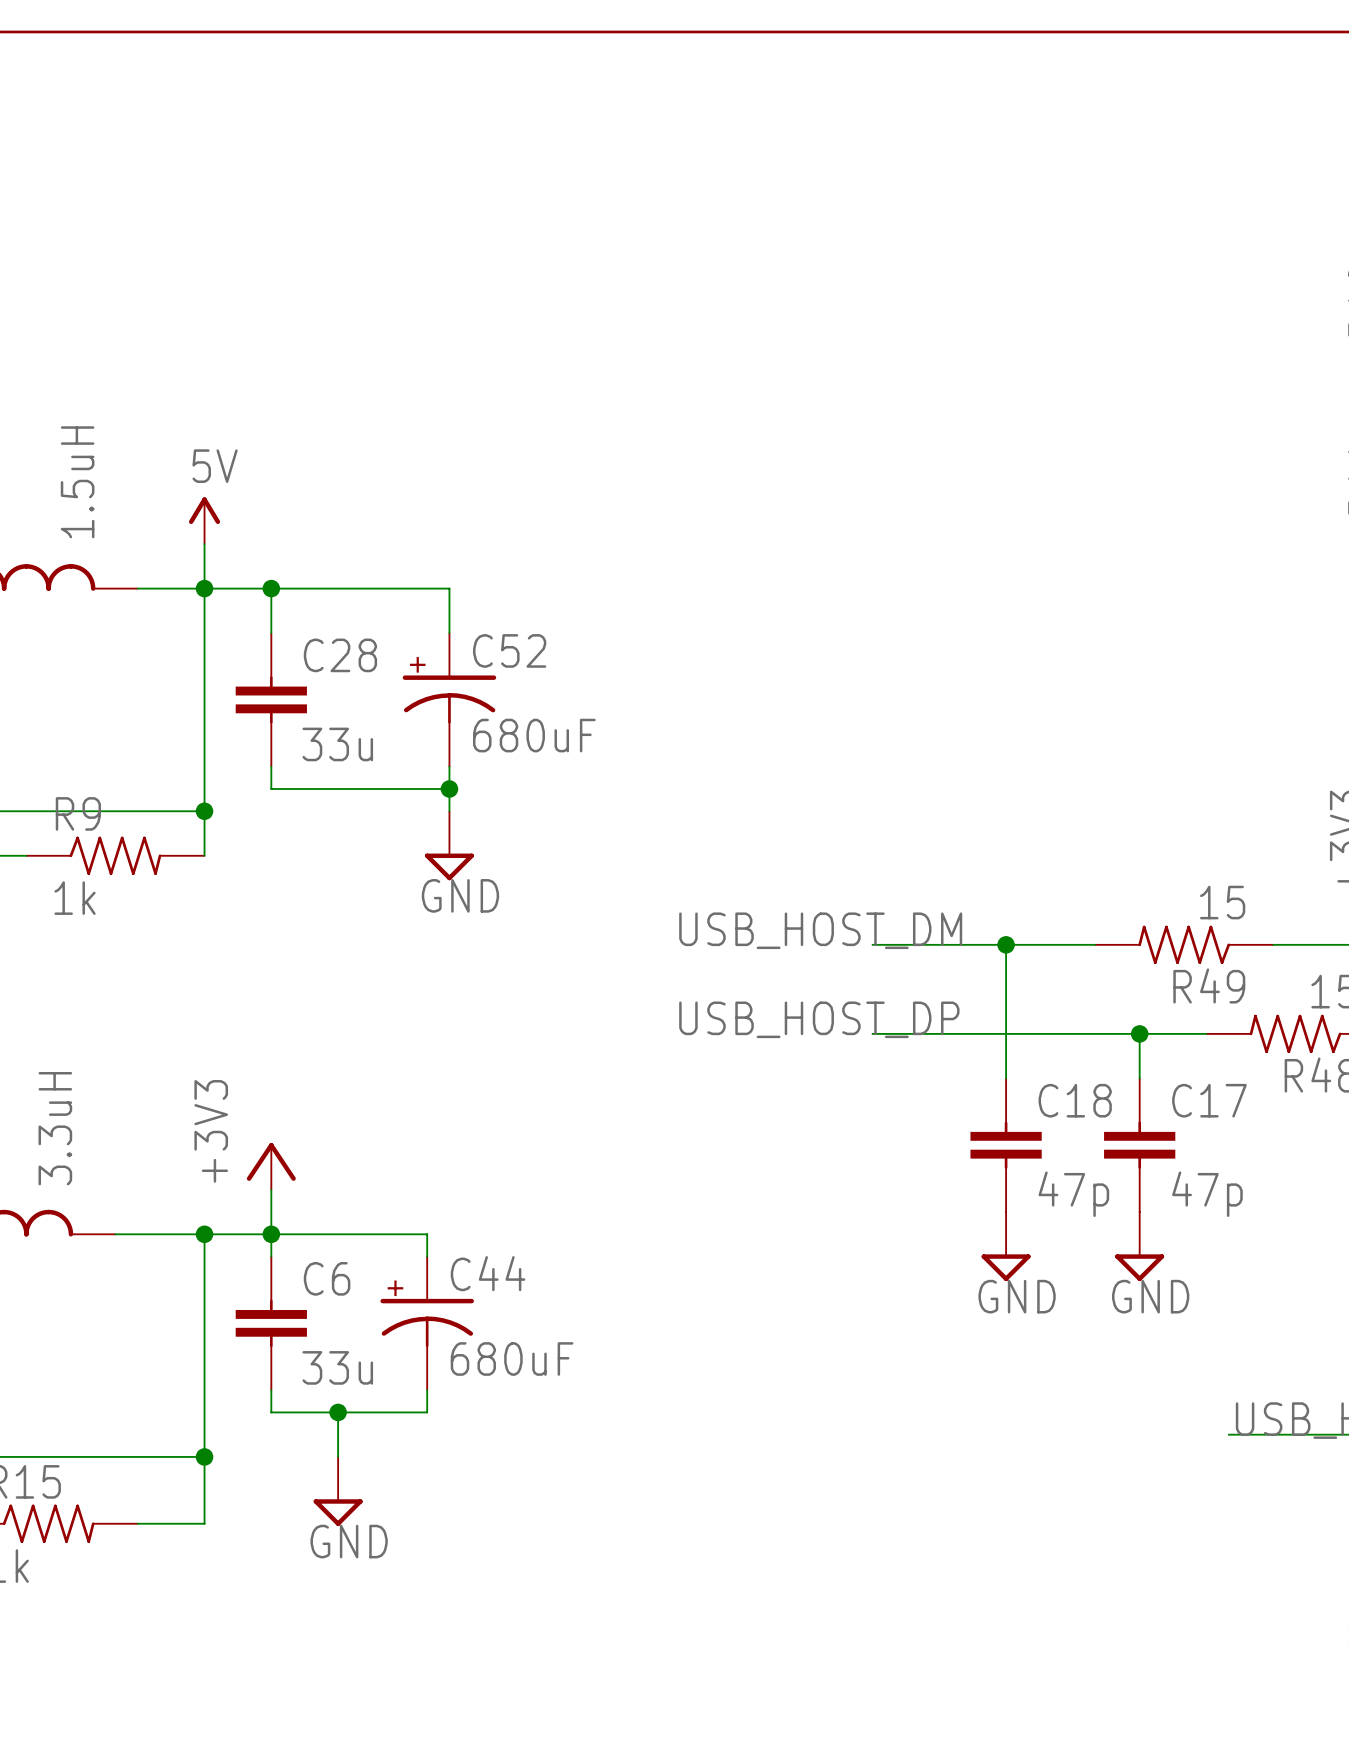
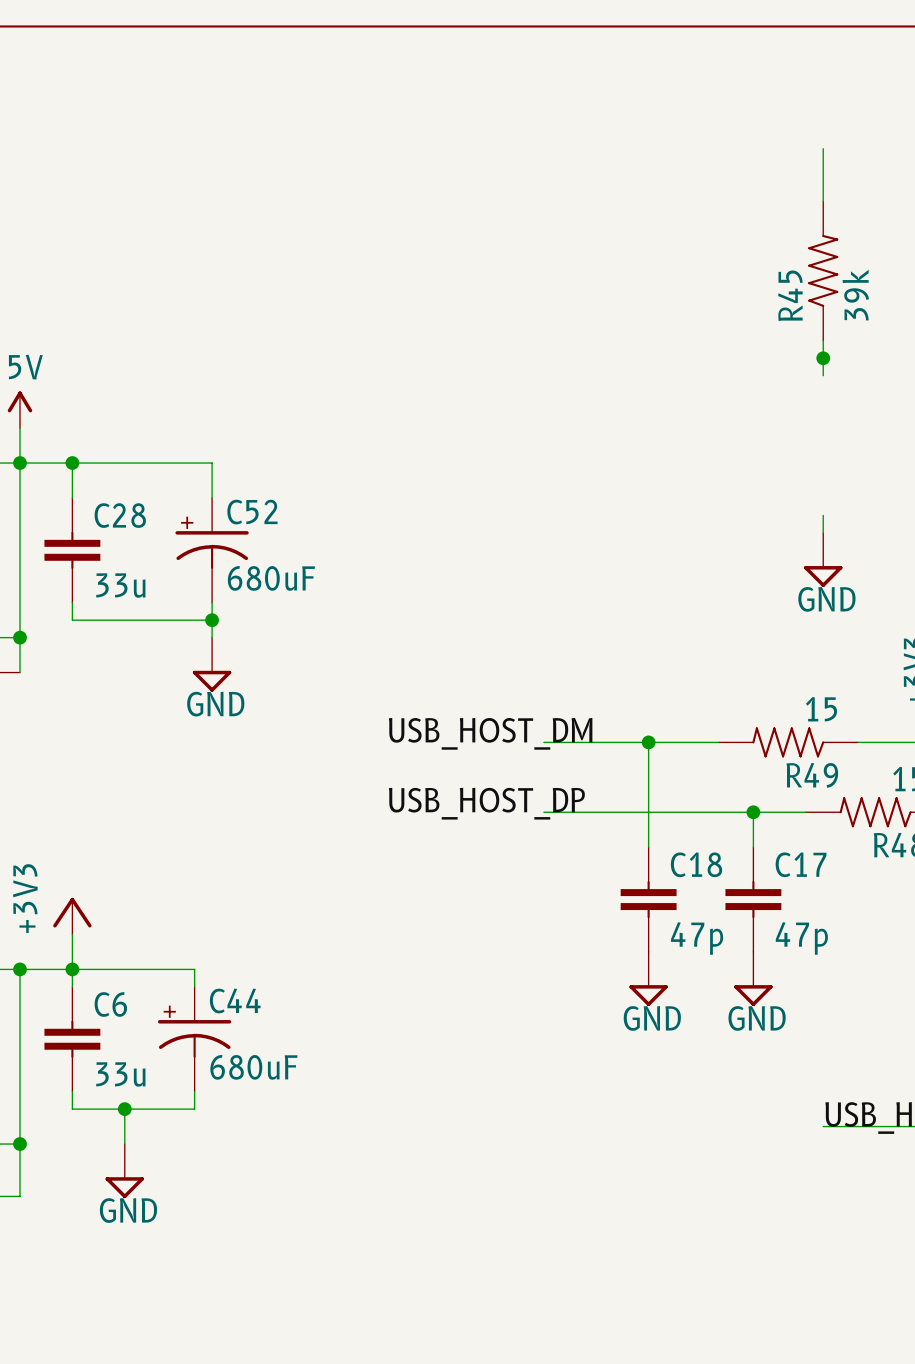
wire: none -> (823, 148) (823, 201)
R45: none -> 39k (823, 270)
wire: none -> (823, 340) (823, 375)
junction: none -> (823, 358)
wire: none -> (823, 515) (823, 532)
power symbol: none -> GND (823, 559)

